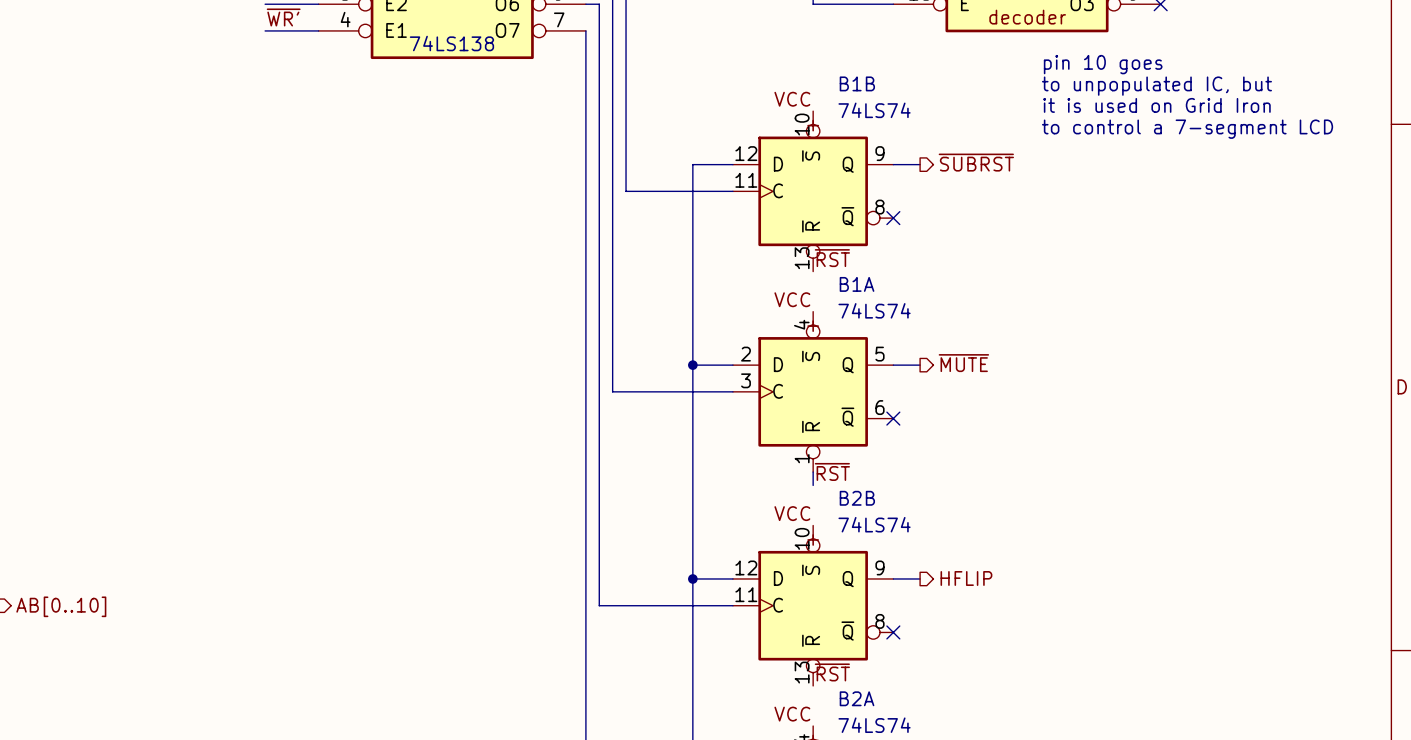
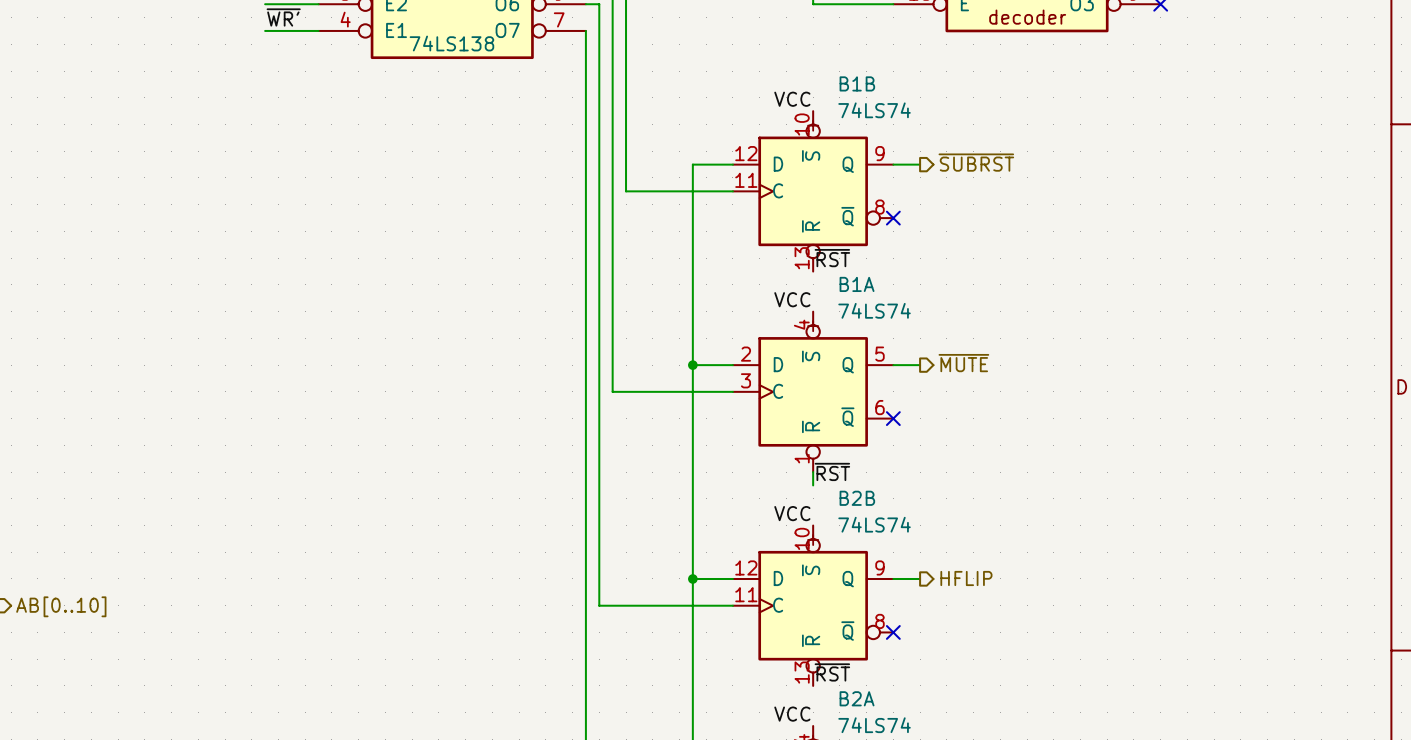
text: pin 10 goes (1103, 64) -> none
text: to unpopulated IC, but (1156, 86) -> none
text: it is used on Grid Iron (1156, 105) -> none
text: to control a 7-segment LCD (1187, 129) -> none

